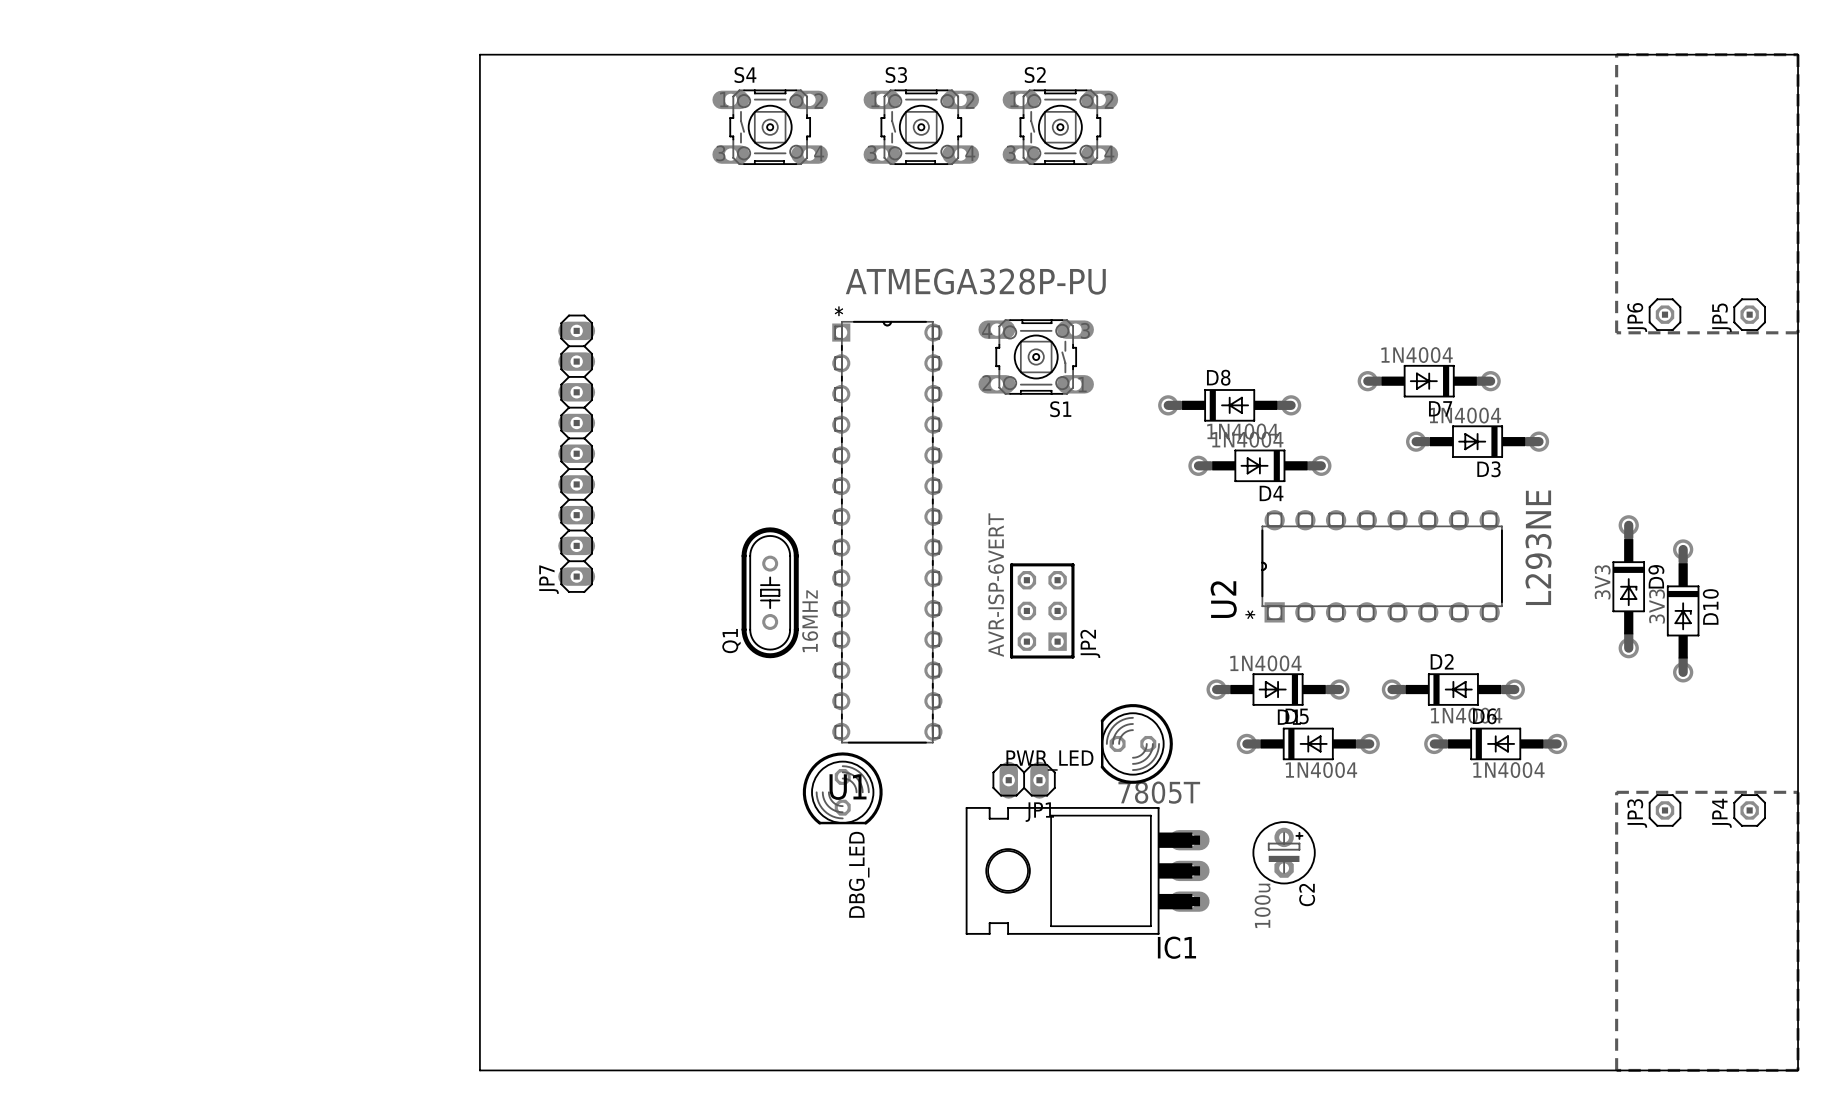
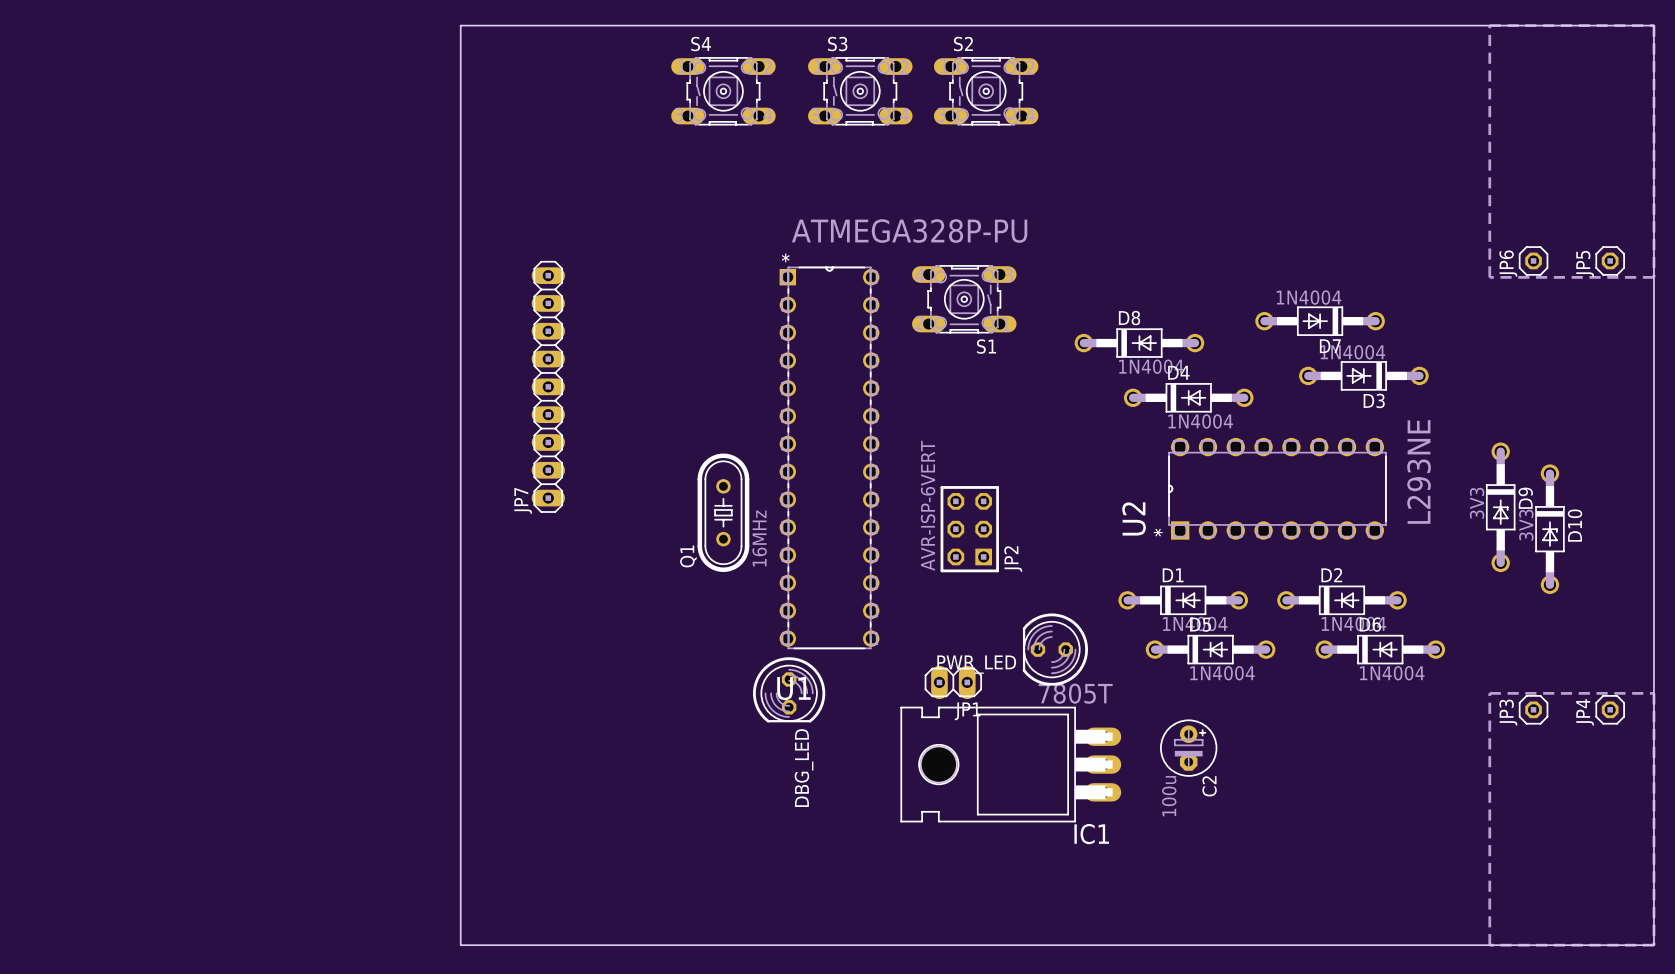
D4 rotation: 0° (1259, 465) -> 180° (1188, 397)
D1 rotation: 0° (1278, 689) -> 180° (1183, 600)

